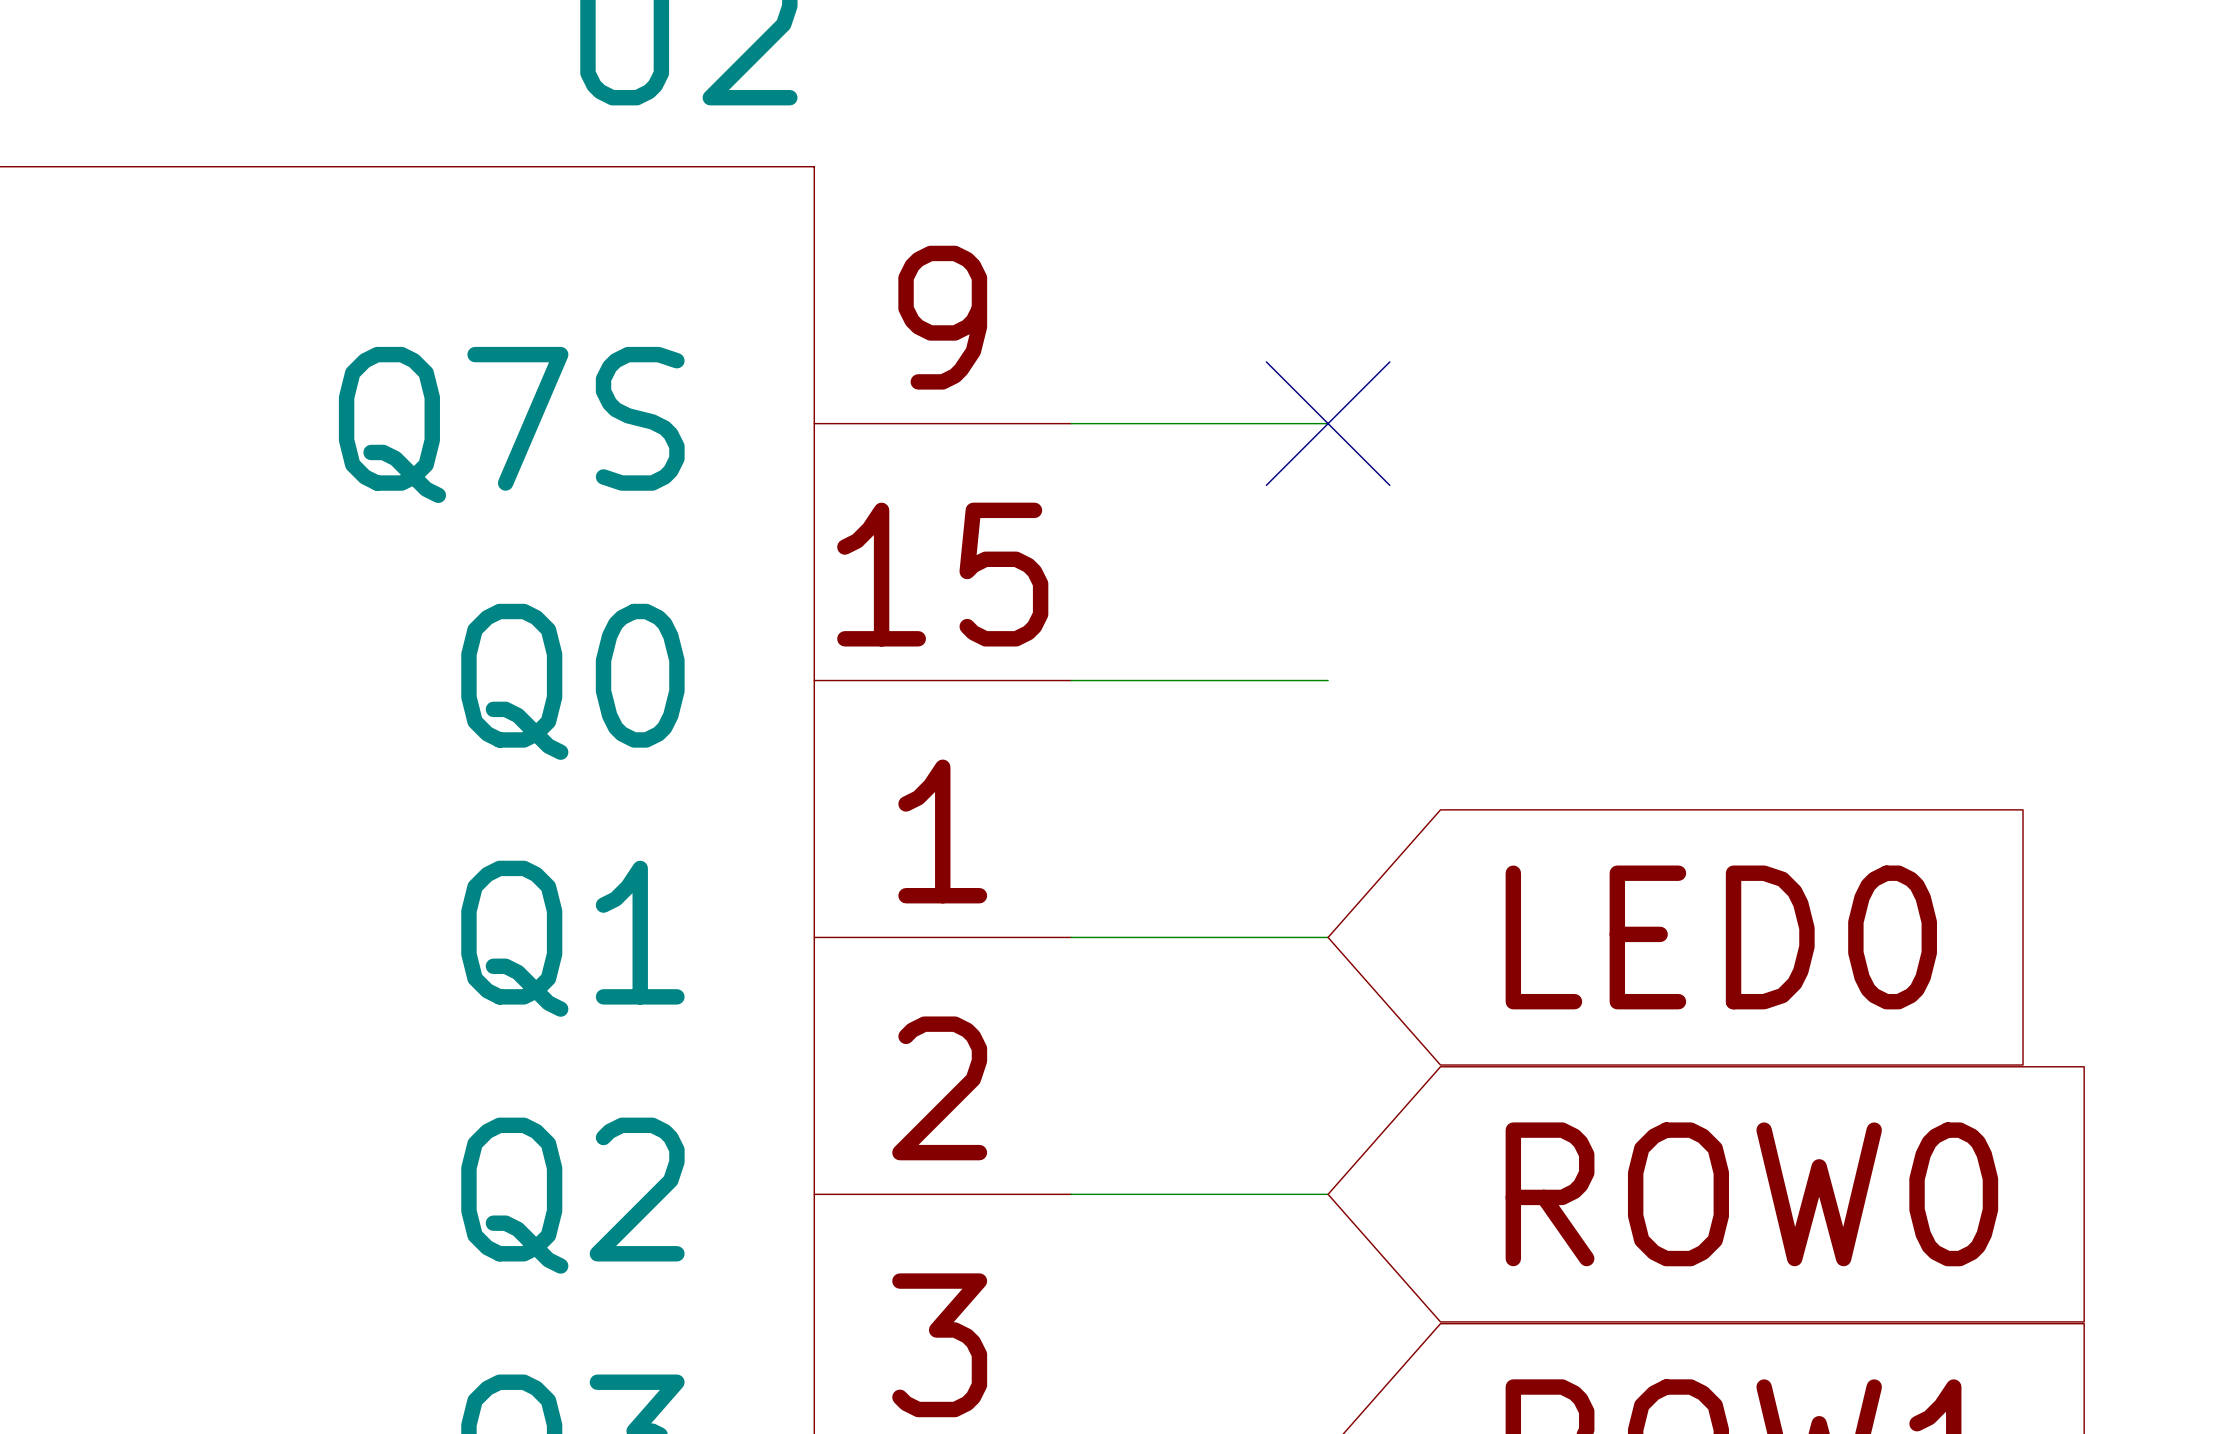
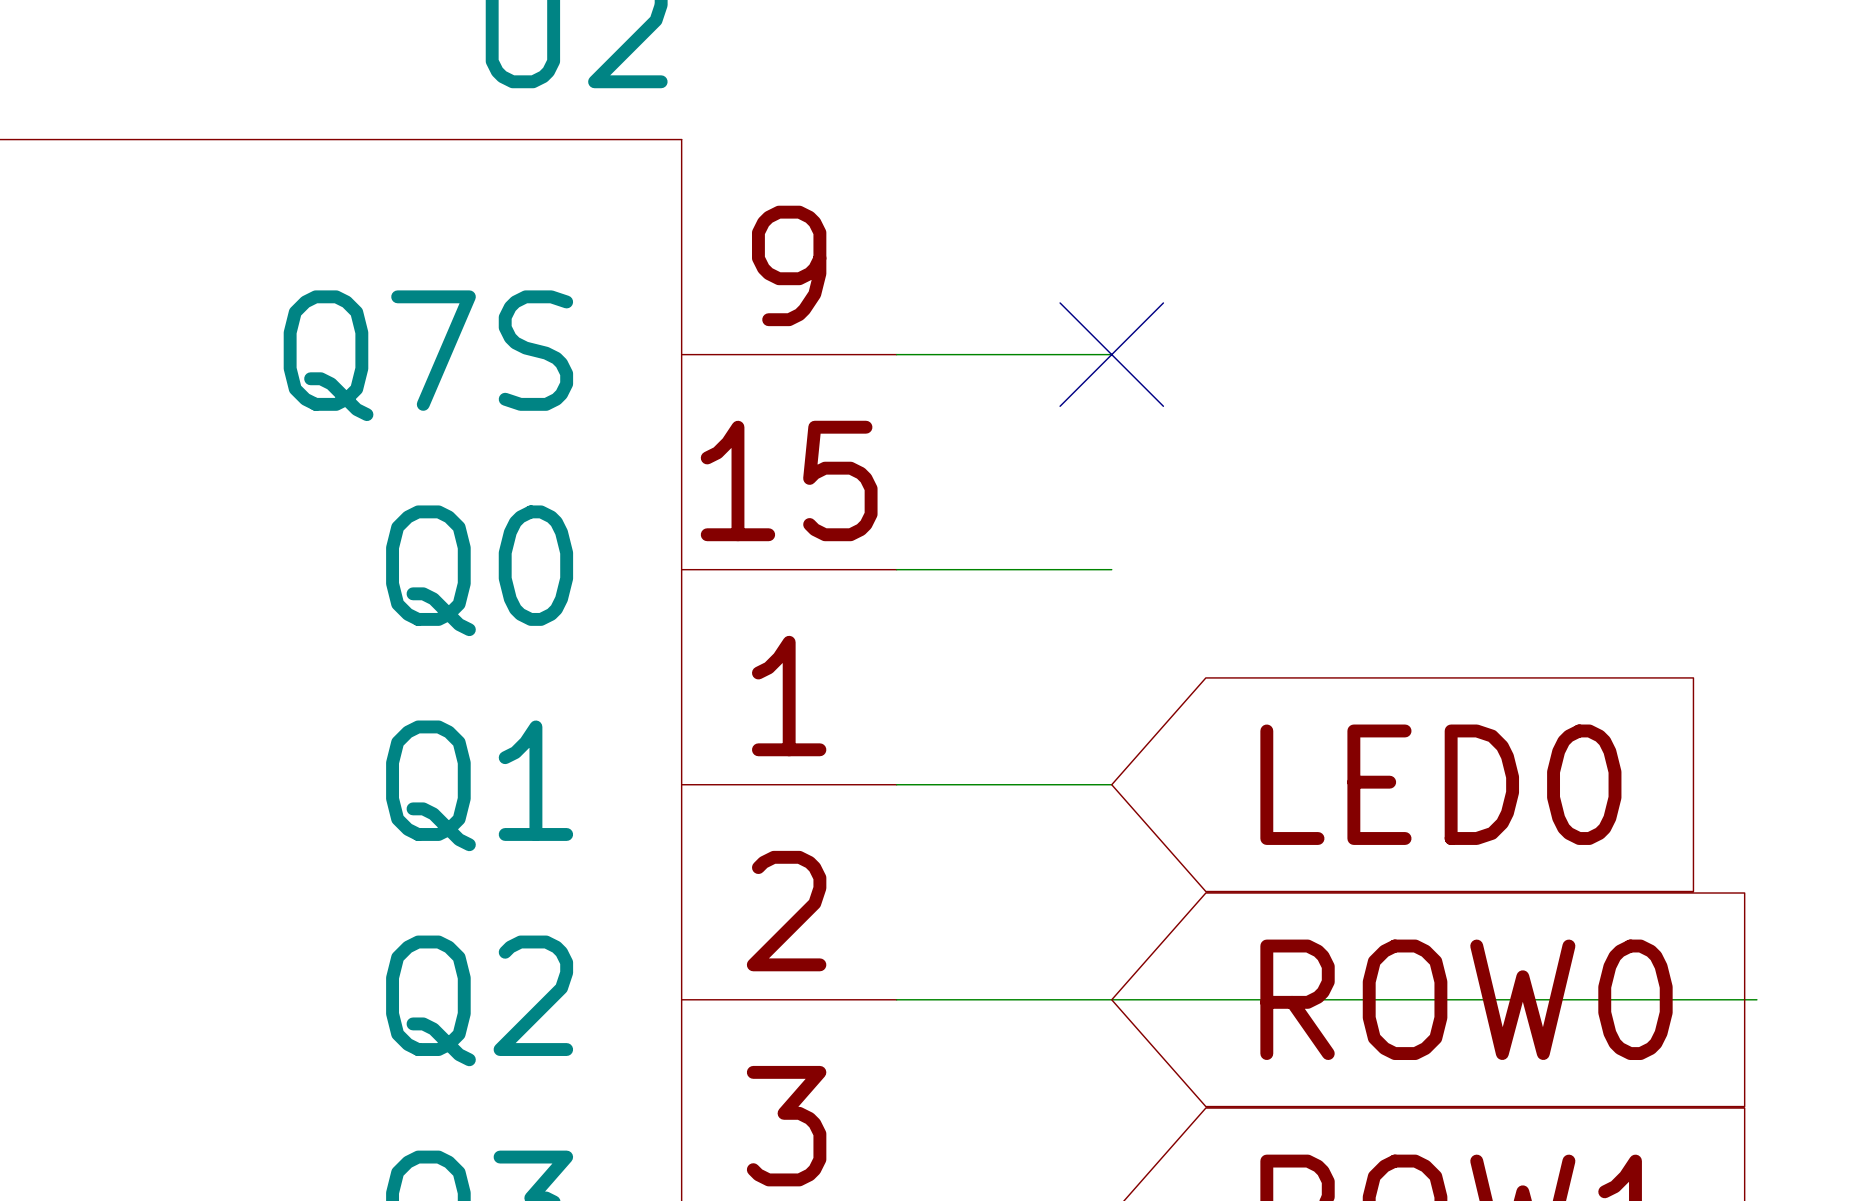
wire: none -> (1111, 999) (1756, 999)

